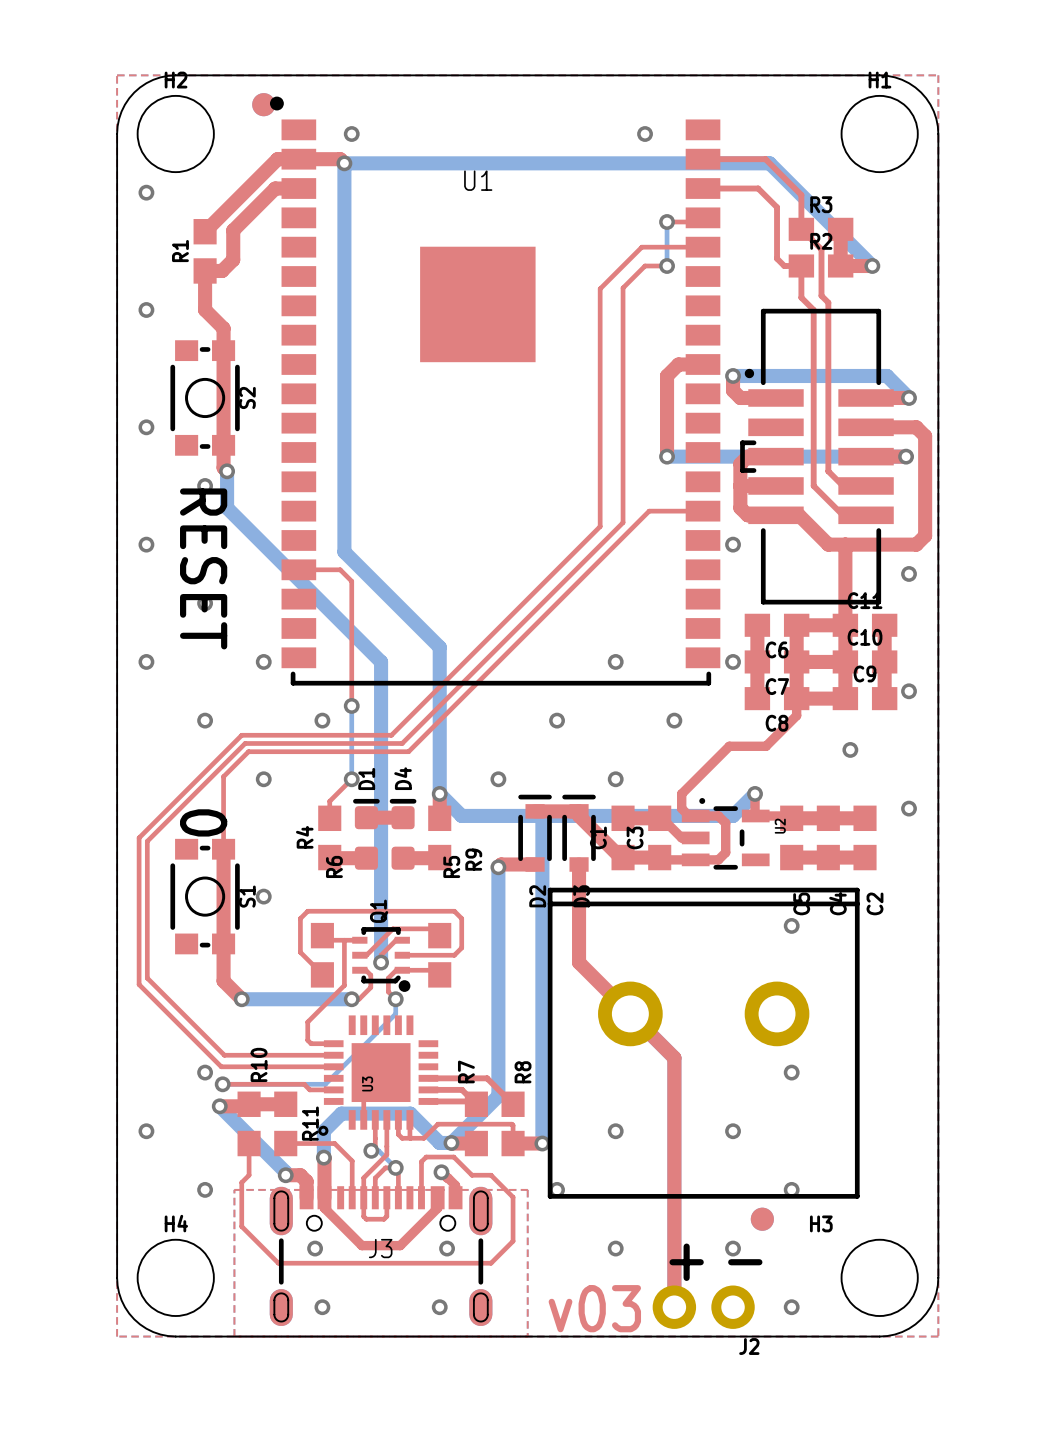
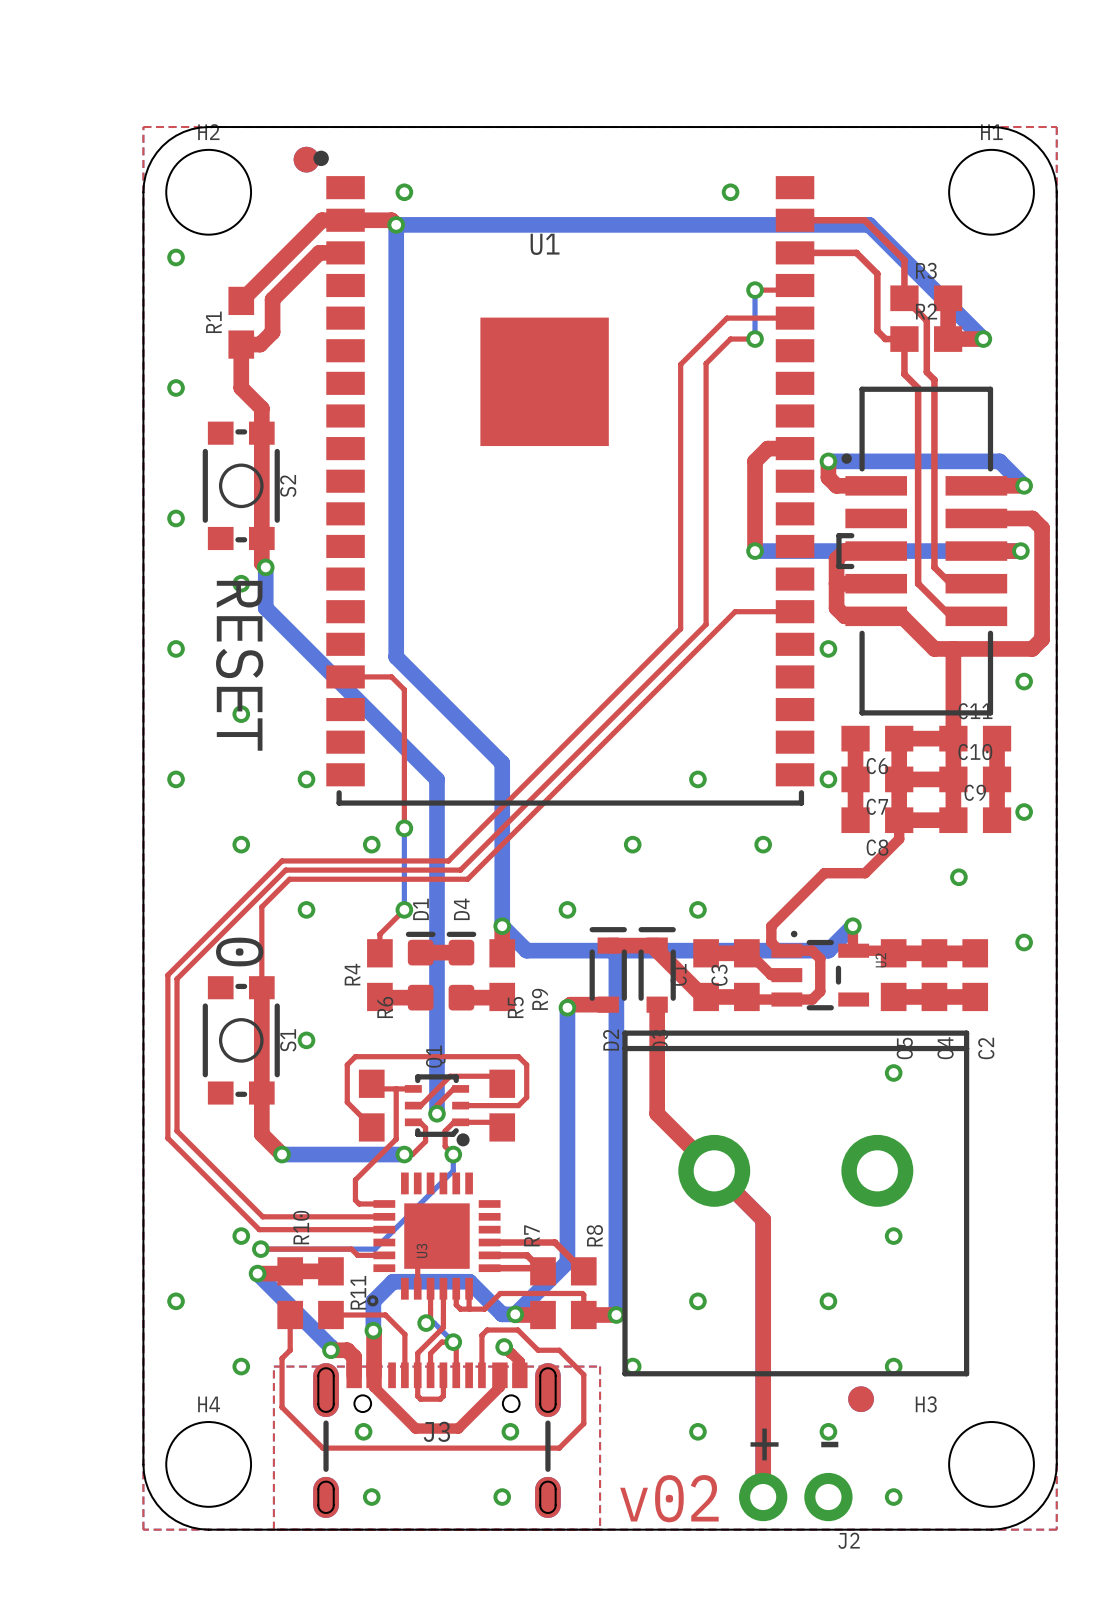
text: v03 (594, 1308) -> v02 (669, 1498)

